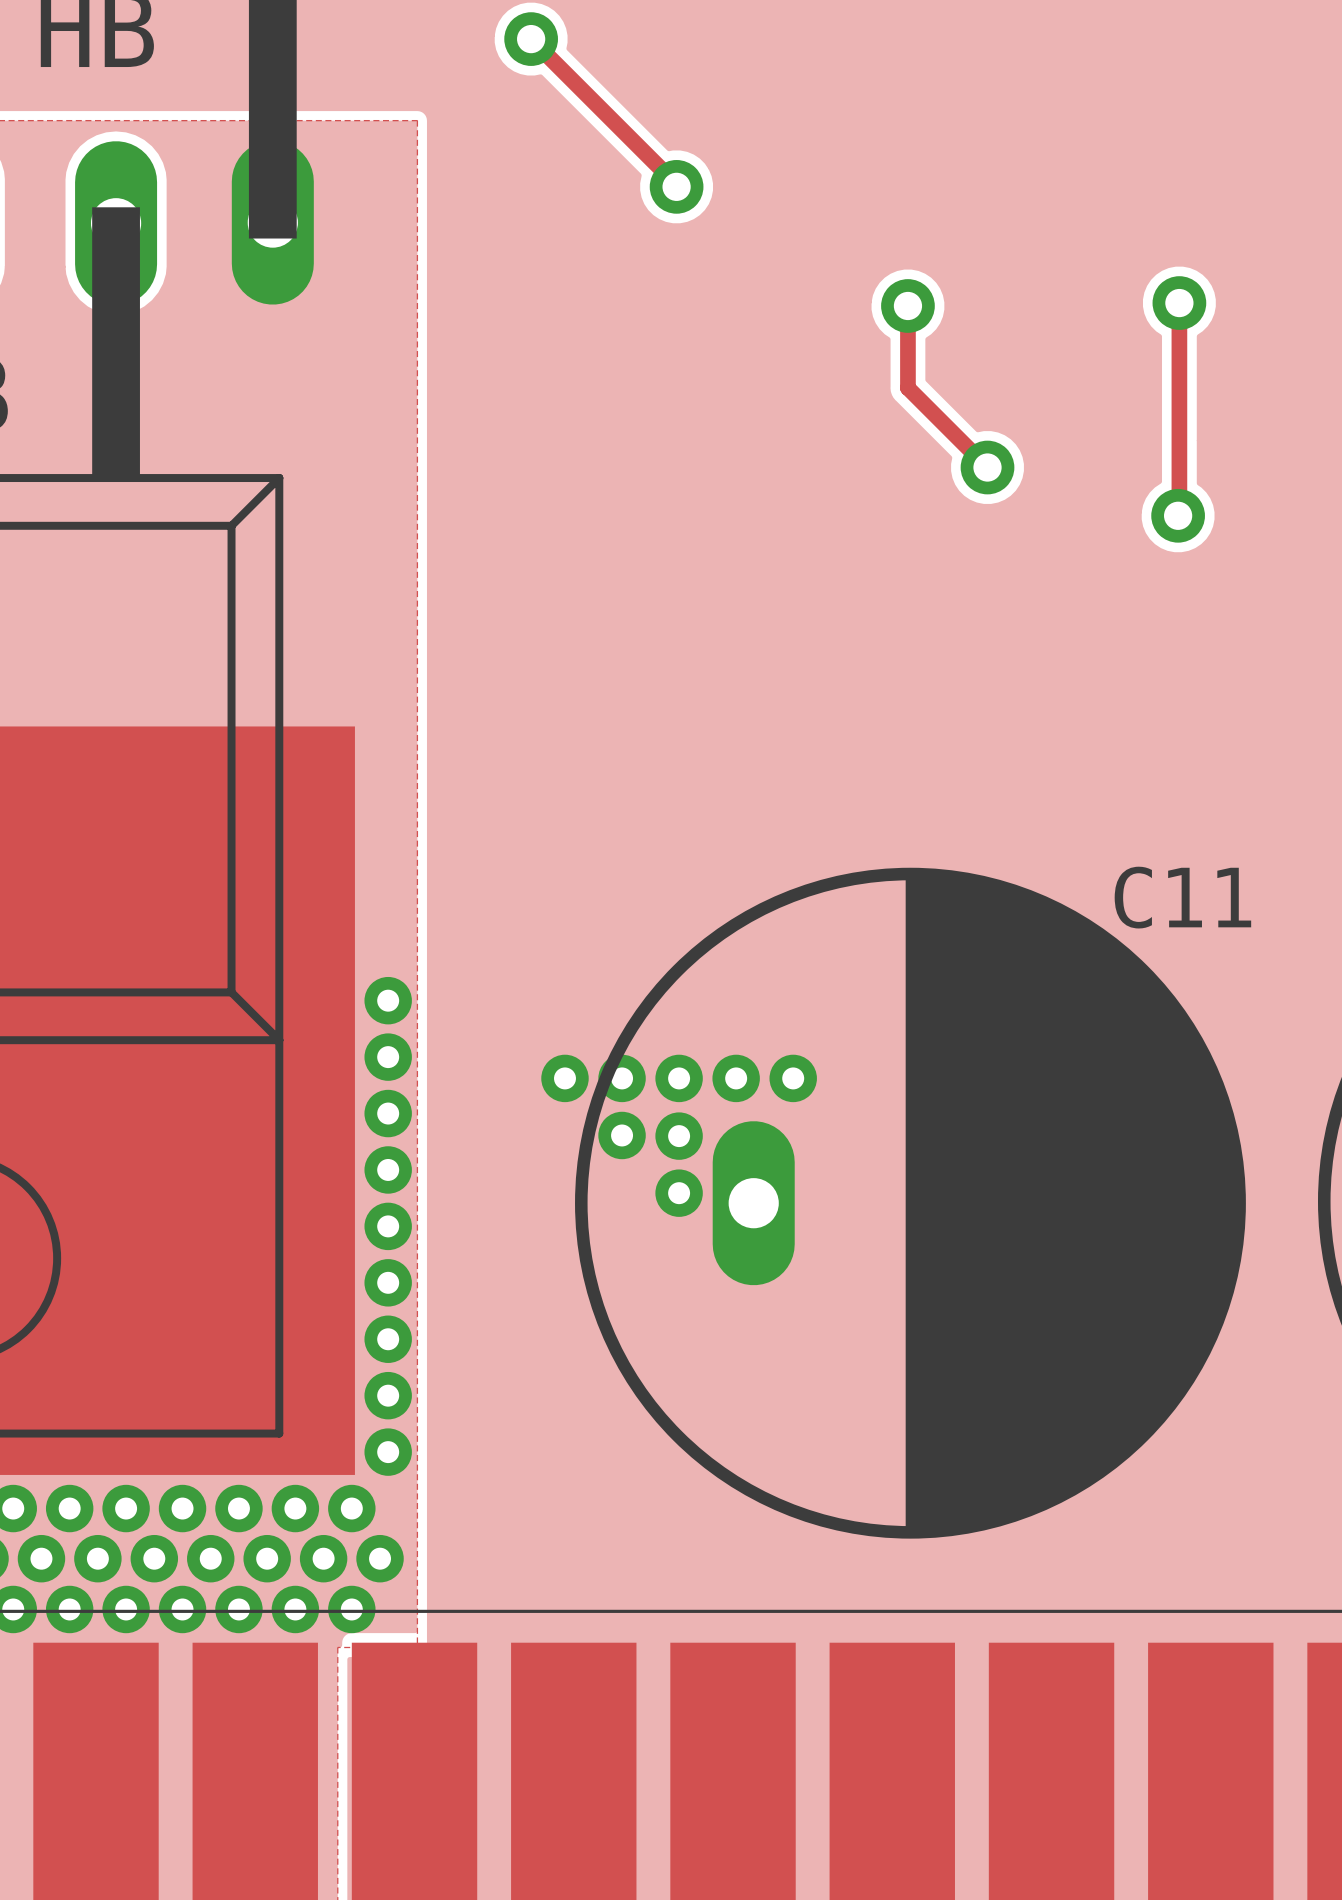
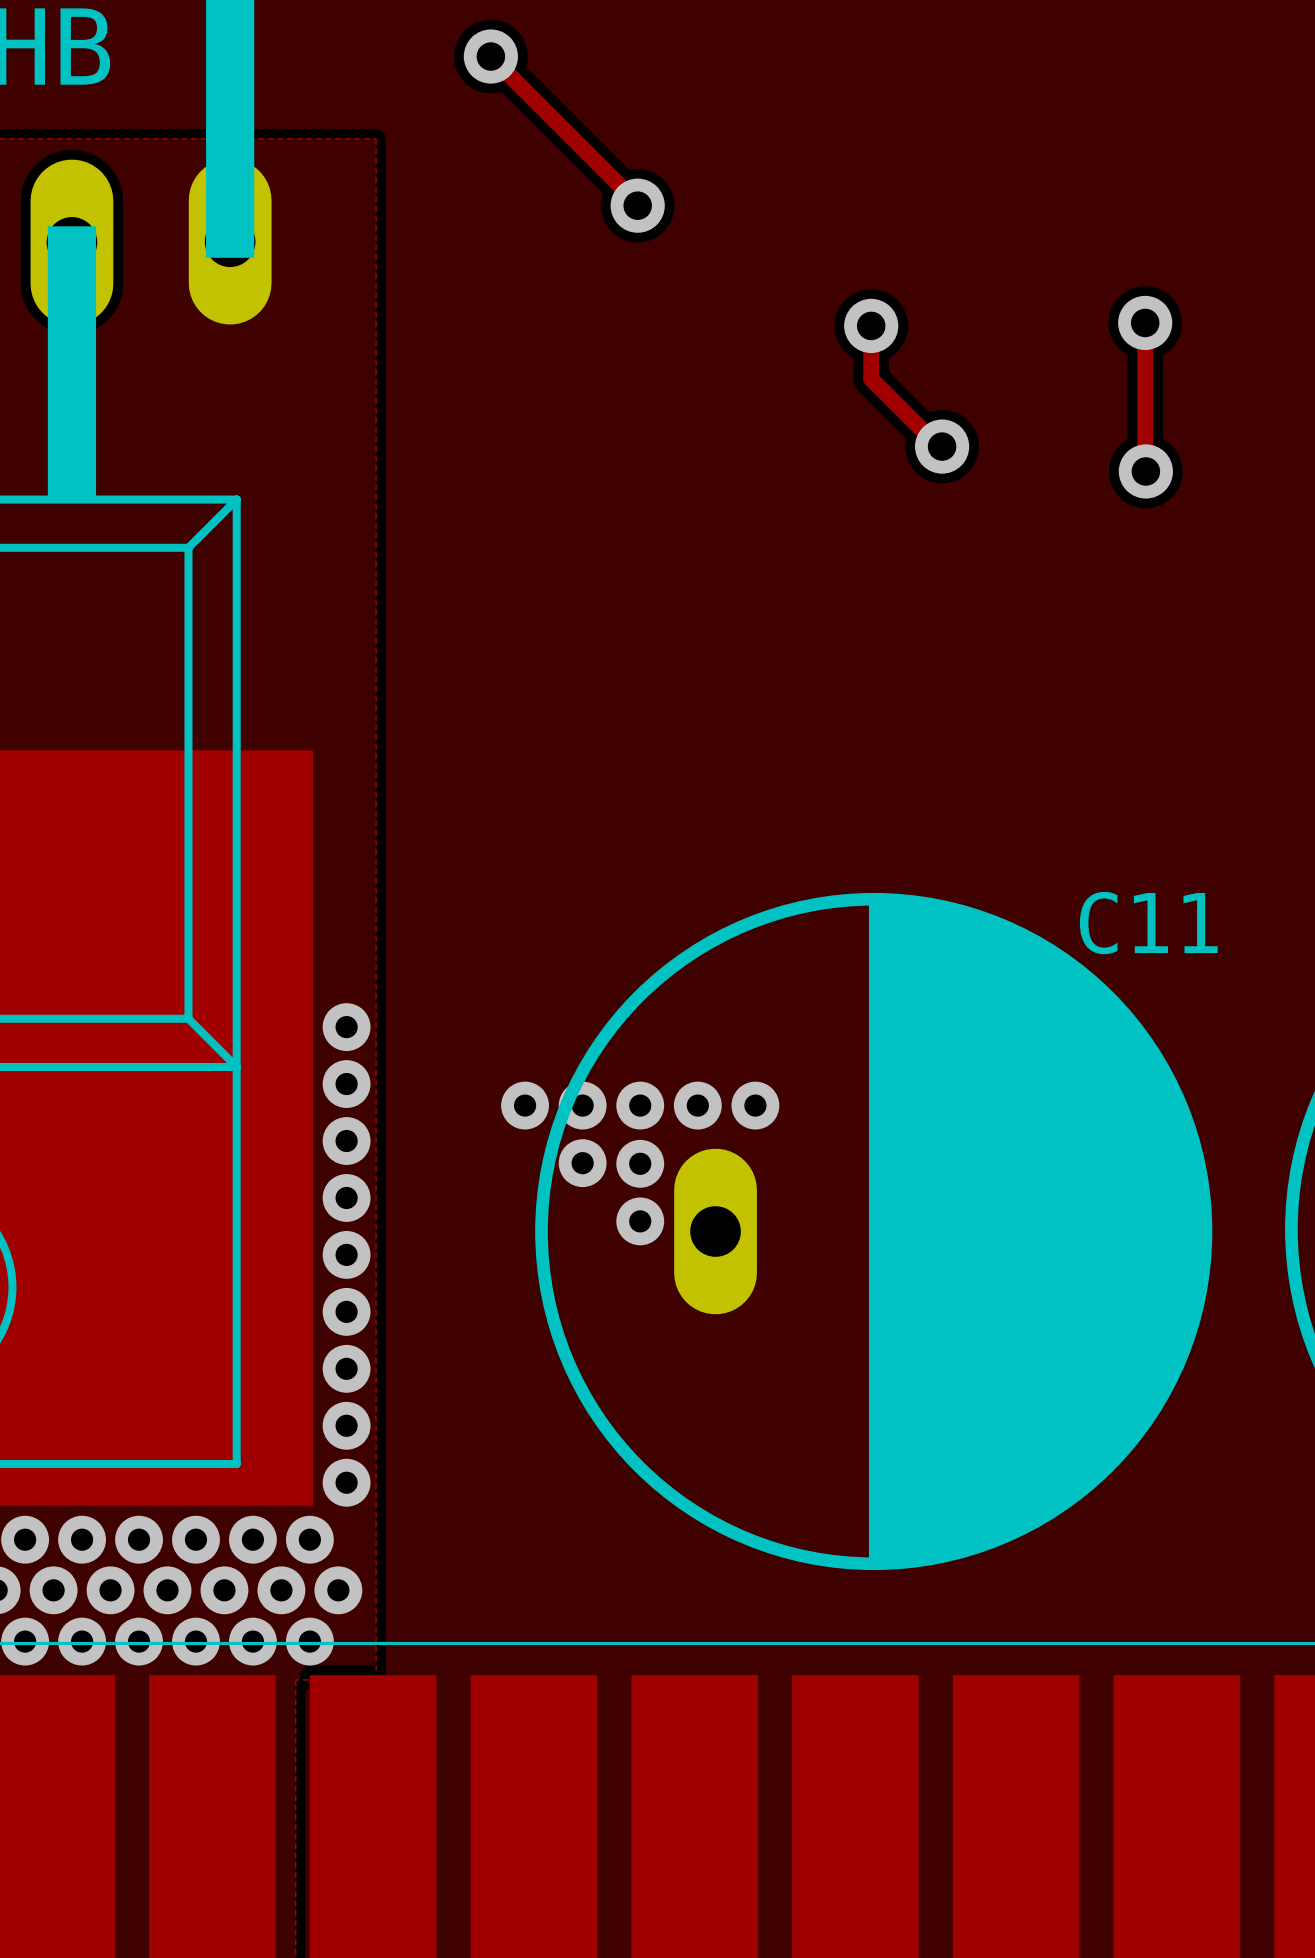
track: (907, 358) (907, 387) (987, 467) -> (871, 378) (938, 446) (942, 446)
track: (1179, 449) (1178, 515) -> none
via position: (987, 467) -> (942, 446)
via position: (1178, 515) -> (1145, 471)

